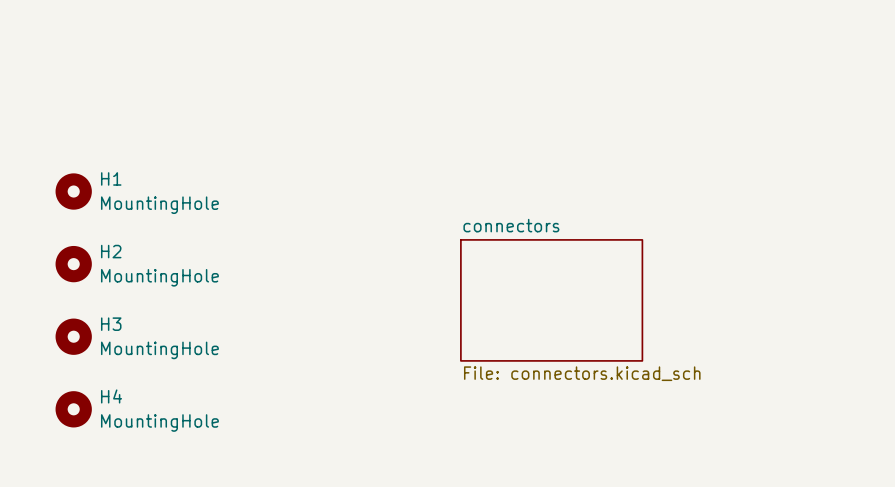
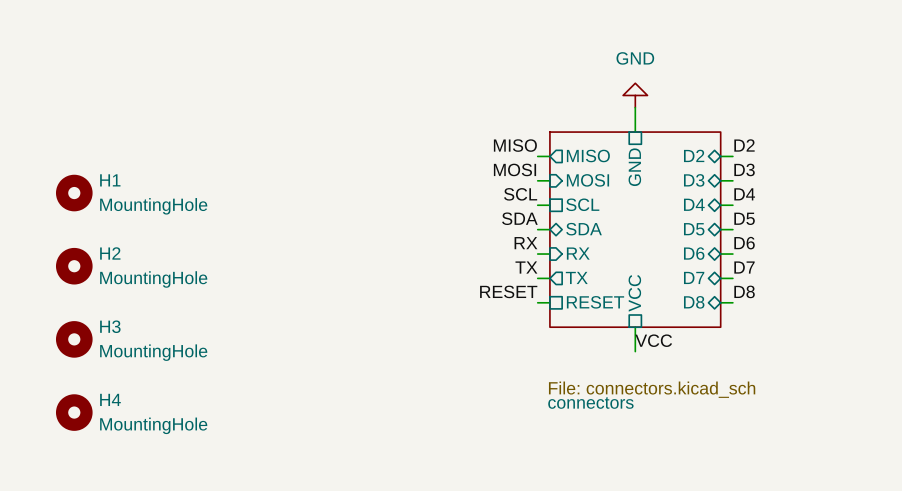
power symbol: none -> GND (635, 95)
wire: none -> (635, 107) (635, 132)
label: none -> MISO (515, 145)
label: none -> D2 (744, 145)
sheet pin: none -> MISO (588, 155)
sheet pin: none -> D2 (694, 155)
wire: none -> (537, 156) (549, 156)
wire: none -> (720, 156) (732, 156)
sheet pin: none -> GND (634, 167)
label: none -> MOSI (515, 169)
label: none -> D3 (744, 169)
sheet pin: none -> MOSI (587, 180)
sheet pin: none -> D3 (694, 180)
wire: none -> (537, 180) (549, 180)
wire: none -> (720, 180) (732, 180)
label: none -> SCL (520, 194)
label: none -> D4 (744, 194)
sheet pin: none -> D4 (694, 204)
wire: none -> (537, 205) (549, 205)
sheet pin: none -> SCL (582, 204)
wire: none -> (720, 205) (732, 205)
label: none -> SDA (519, 218)
label: none -> D5 (744, 218)
wire: none -> (537, 229) (549, 229)
sheet pin: none -> SDA (584, 229)
sheet connectors: none -> File: connectors.kicad_sch (635, 229)
sheet pin: none -> D5 (694, 229)
wire: none -> (720, 229) (732, 229)
label: none -> RX (525, 243)
label: none -> D6 (744, 243)
sheet pin: none -> RX (578, 253)
sheet pin: none -> D6 (694, 253)
wire: none -> (537, 254) (549, 254)
wire: none -> (720, 254) (732, 254)
label: none -> TX (526, 267)
label: none -> D7 (744, 267)
sheet pin: none -> TX (576, 277)
sheet pin: none -> D7 (694, 277)
wire: none -> (537, 278) (549, 278)
wire: none -> (720, 278) (732, 278)
label: none -> RESET (508, 291)
label: none -> D8 (744, 291)
sheet pin: none -> VCC (634, 293)
sheet pin: none -> RESET (595, 302)
sheet pin: none -> D8 (694, 302)
wire: none -> (537, 302) (549, 302)
sheet connectors: File: connectors.kicad_sch (551, 300) -> none
wire: none -> (720, 302) (732, 302)
wire: none -> (635, 327) (635, 351)
label: none -> VCC (653, 340)

